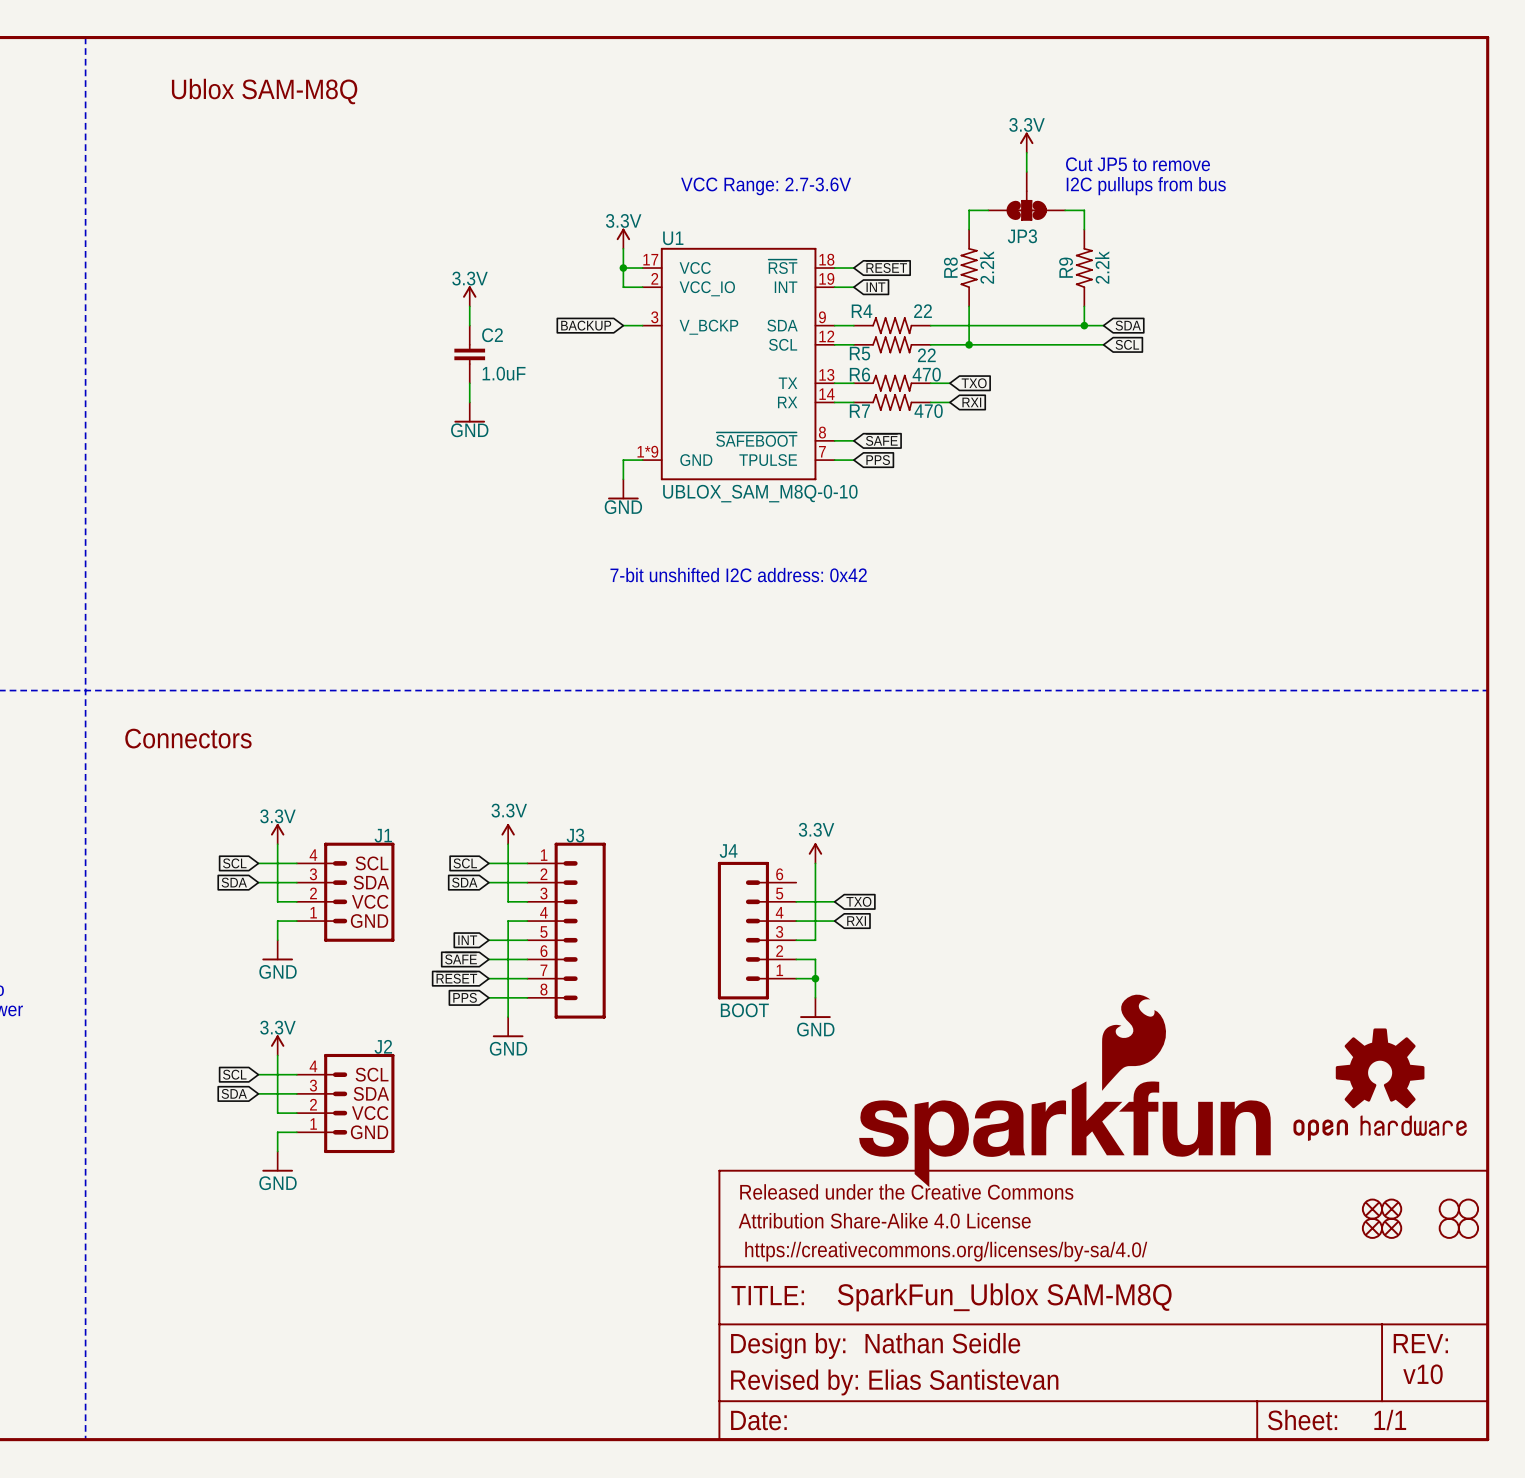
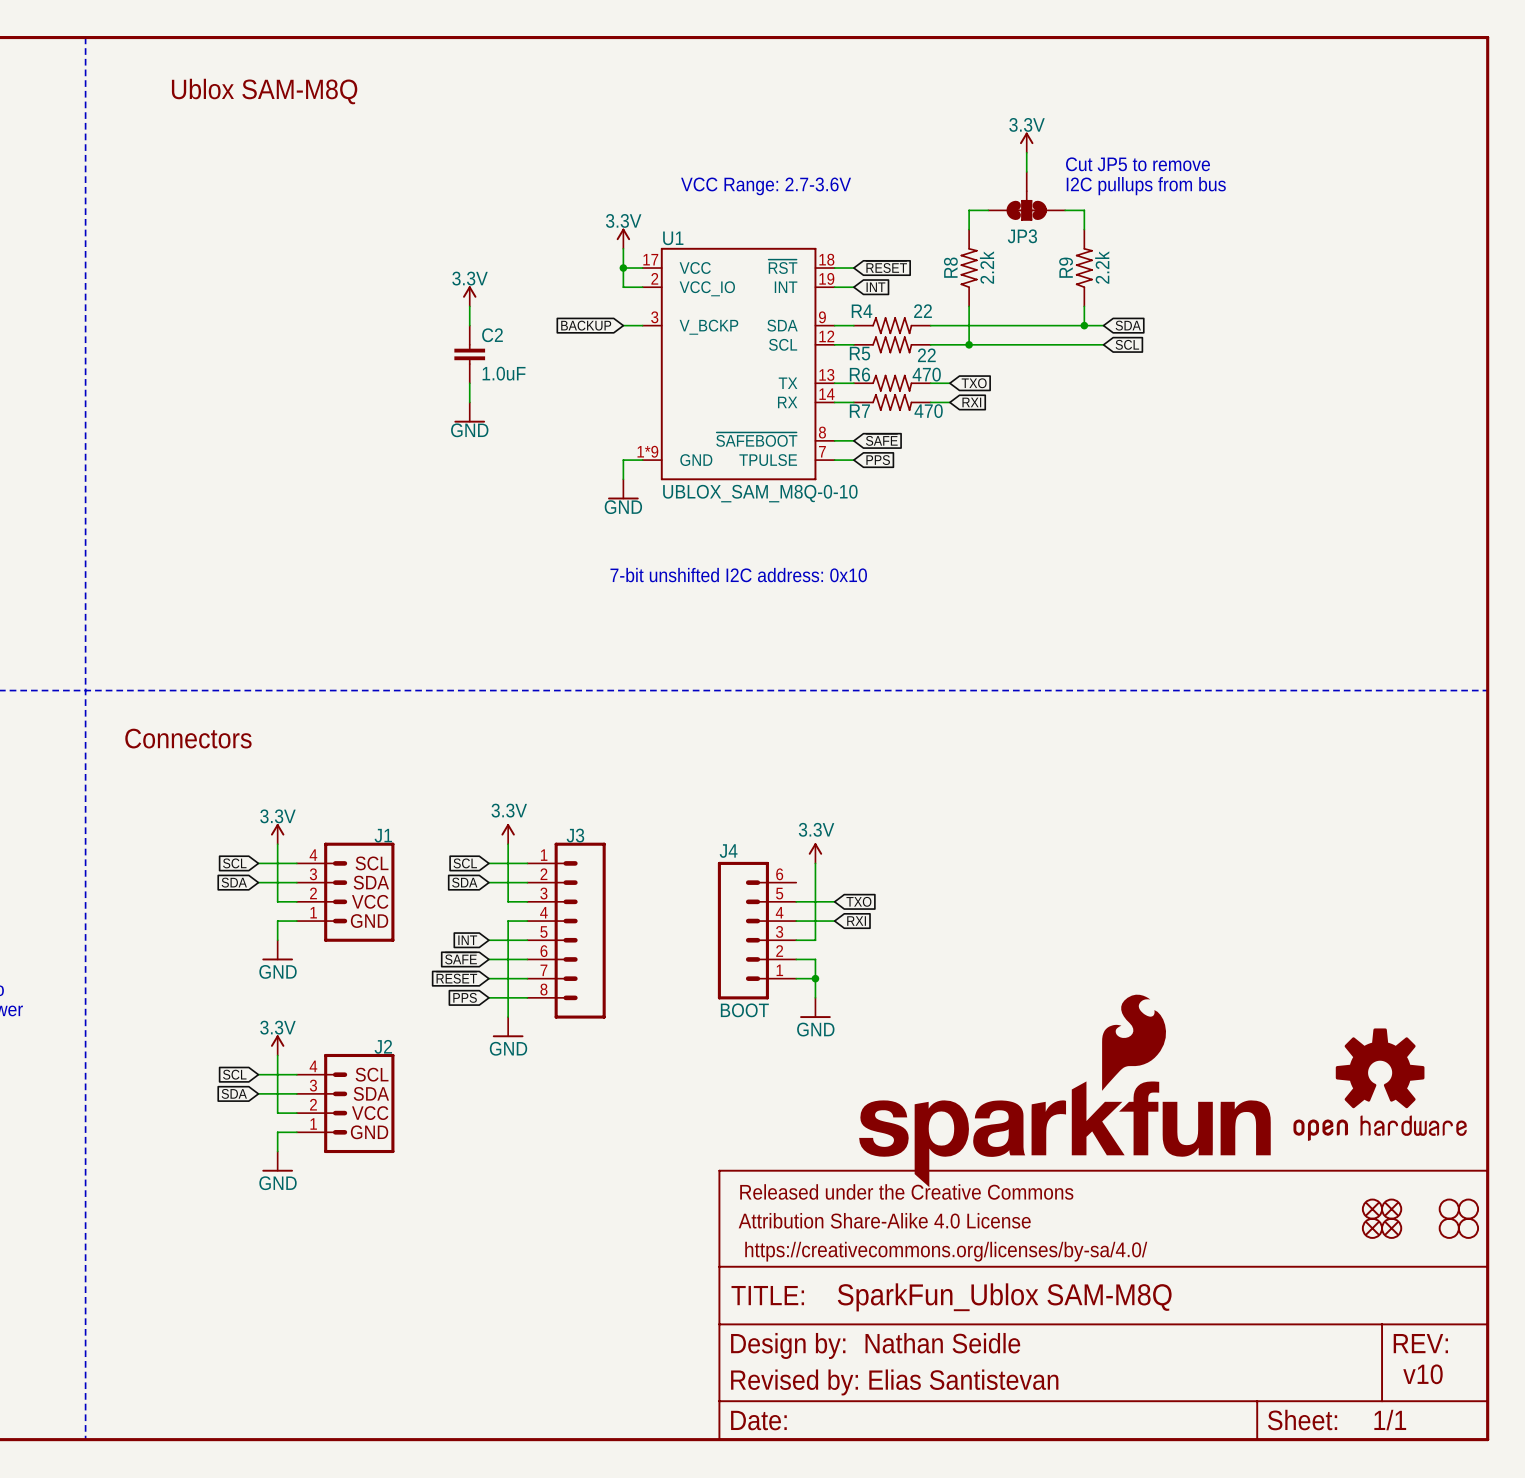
text: 7-bit unshifted I2C address: 0x42 (738, 575) -> 7-bit unshifted I2C address: 0x10 (738, 575)

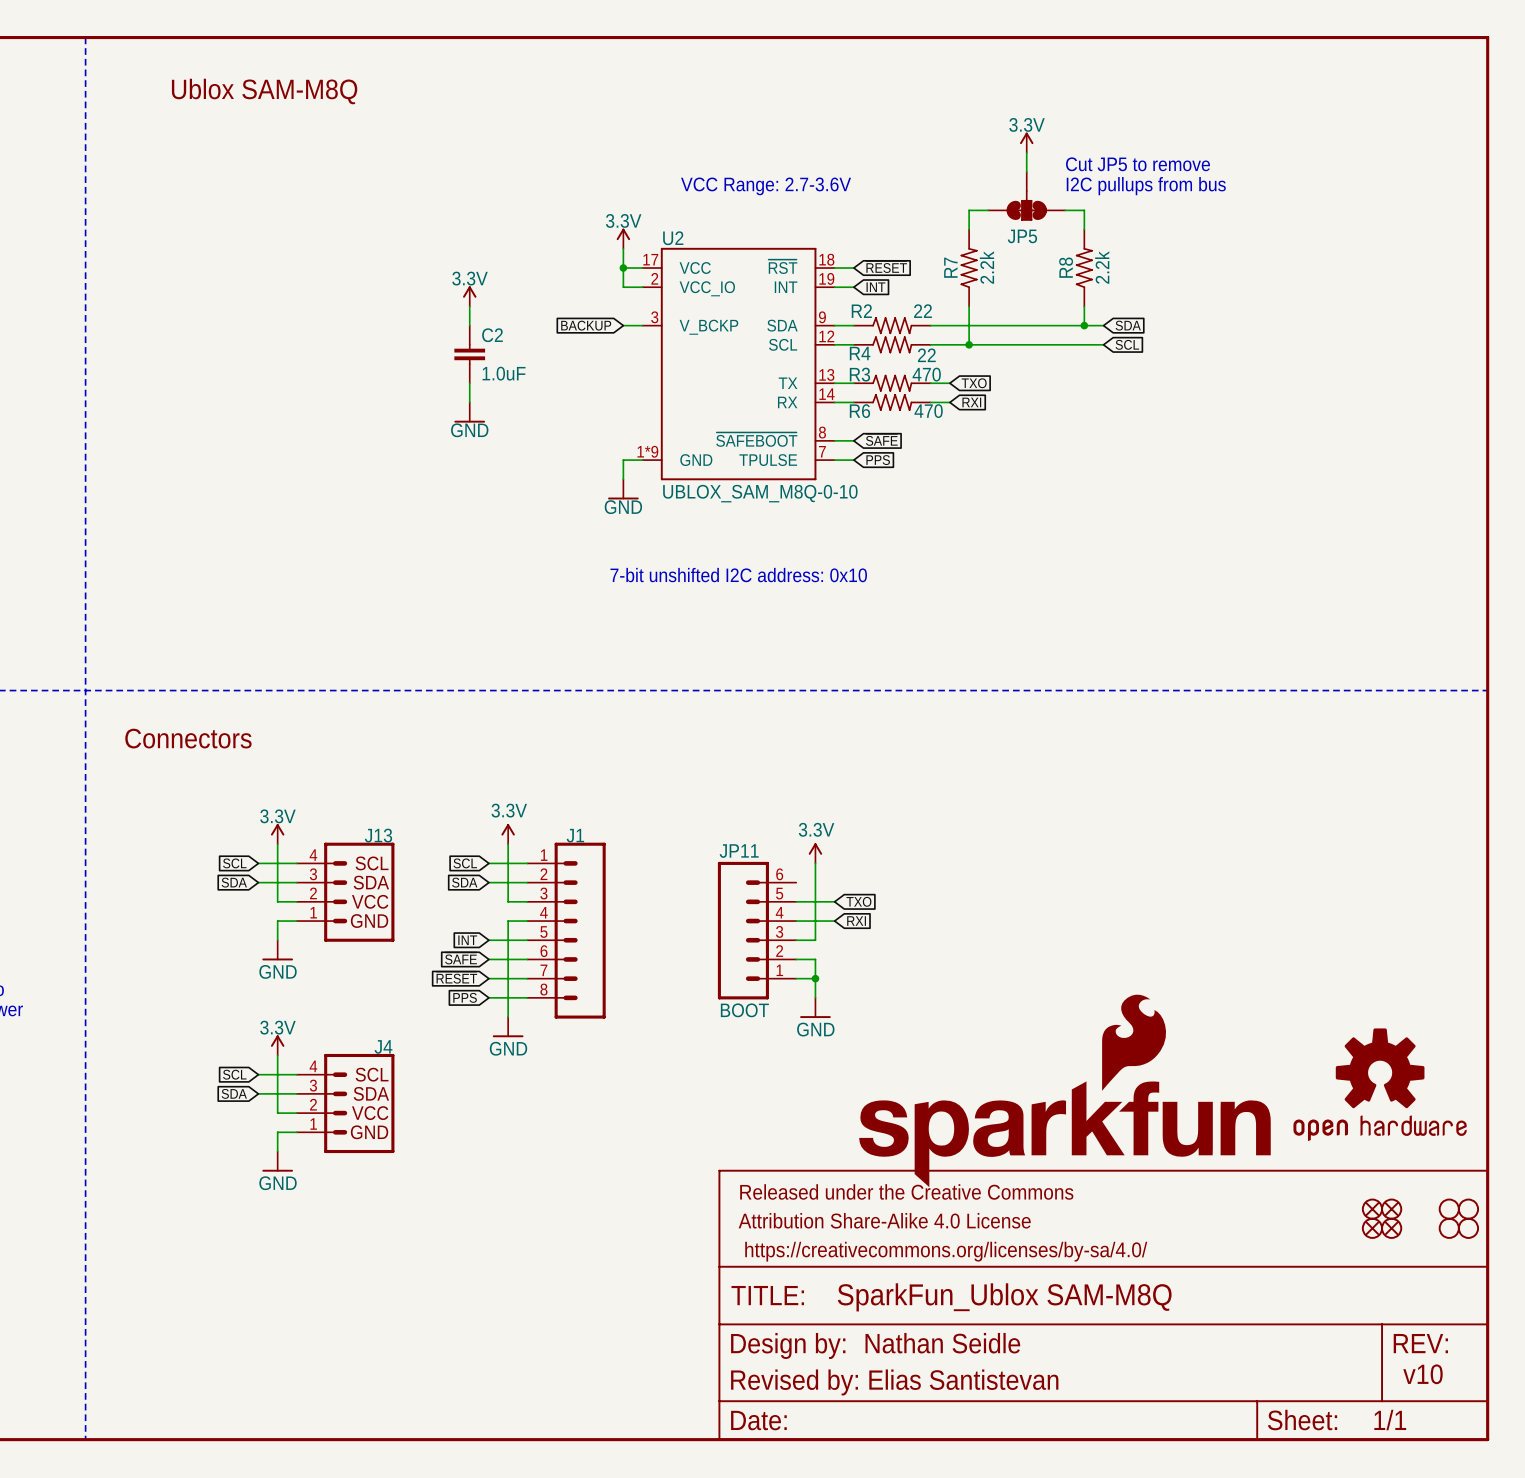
JP3 name: JP3 (1022, 236) -> JP5 (1022, 236)
U1 name: U1 (673, 238) -> U2 (673, 238)
R8 name: R8 (950, 267) -> R7 (950, 267)
R9 name: R9 (1066, 267) -> R8 (1066, 267)
R4 name: R4 (862, 311) -> R2 (861, 311)
R5 name: R5 (859, 353) -> R4 (860, 353)
R6 name: R6 (859, 374) -> R3 (859, 374)
R7 name: R7 (859, 411) -> R6 (859, 411)
J1 name: J1 (383, 835) -> J13 (378, 835)
J3 name: J3 (575, 835) -> J1 (575, 835)
J4 name: J4 (728, 851) -> JP11 (739, 851)
J2 name: J2 (383, 1046) -> J4 (383, 1046)

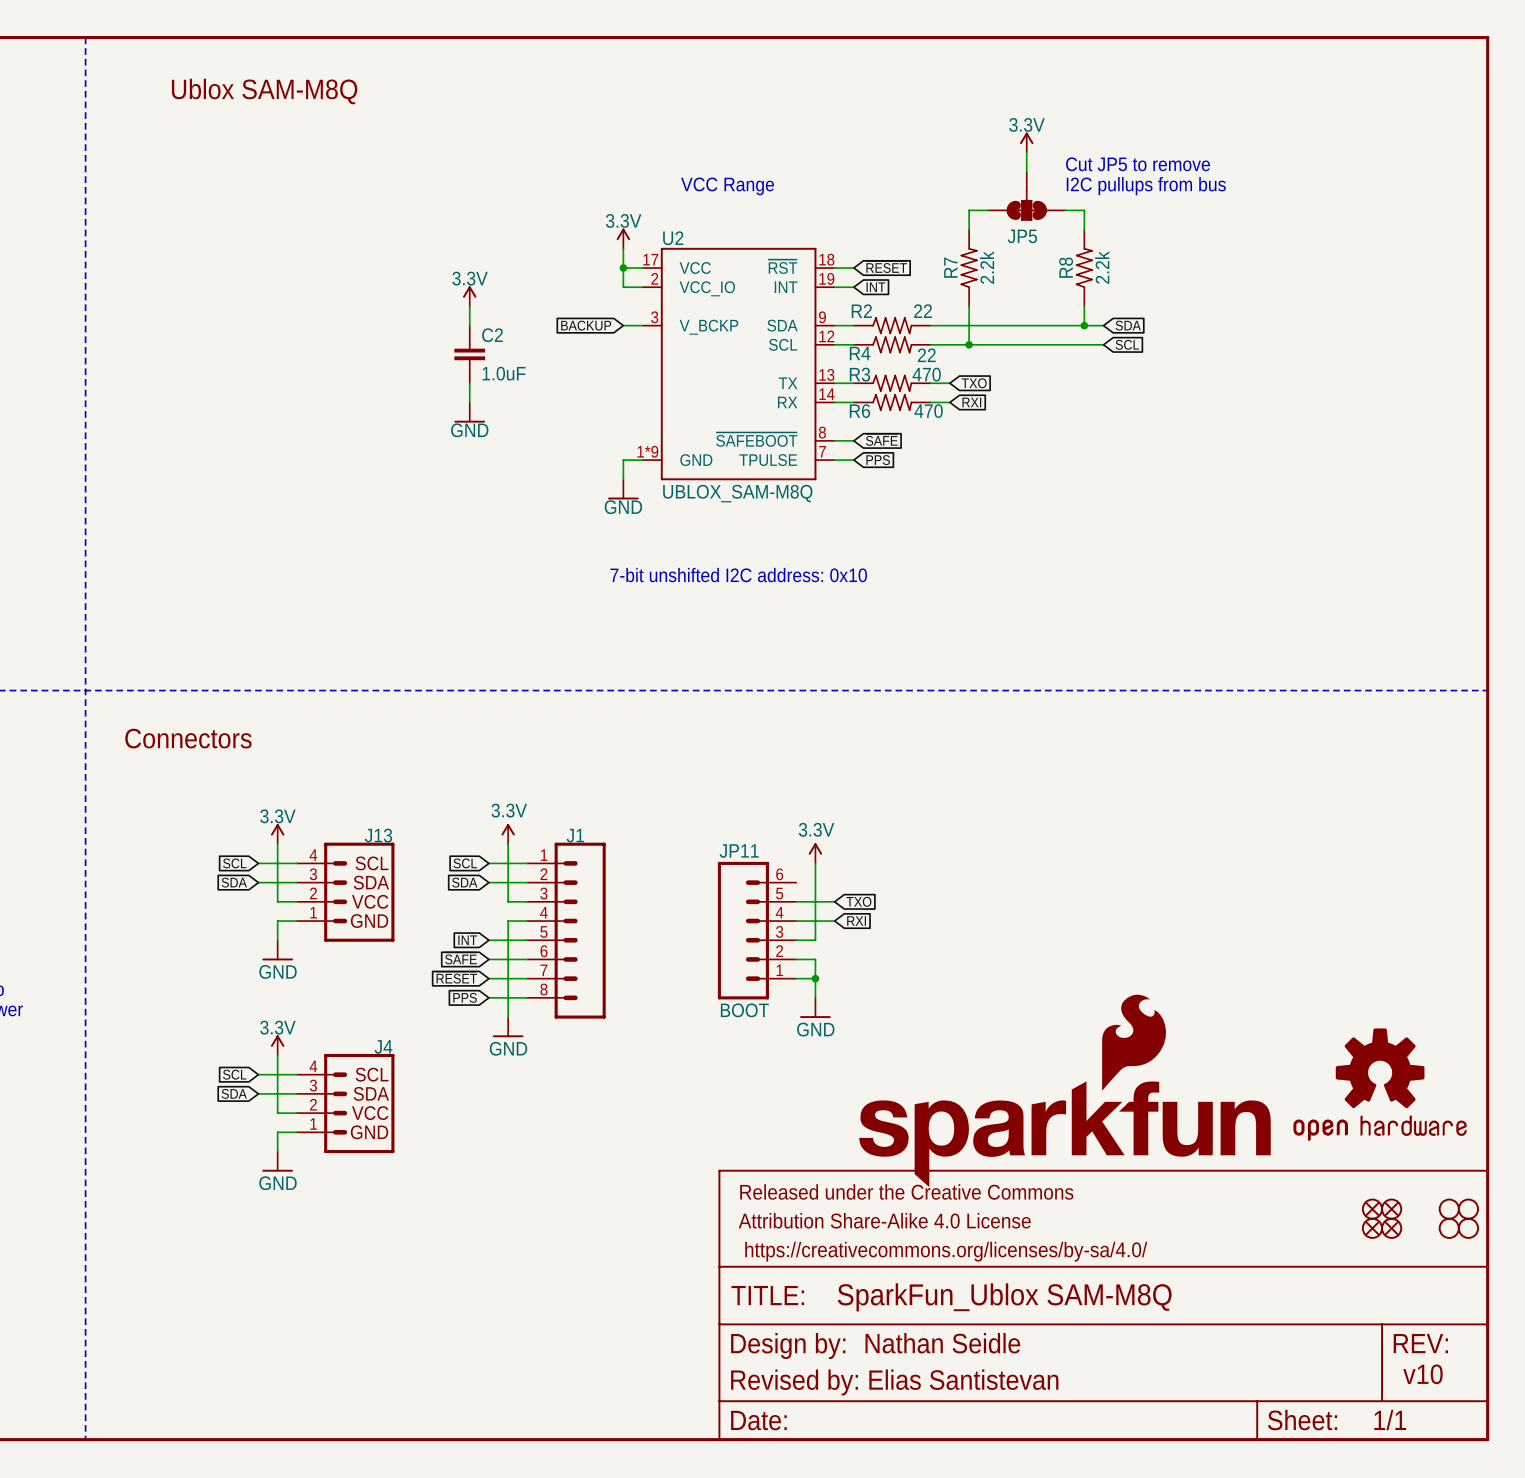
text: VCC Range: 2.7-3.6V (766, 186) -> VCC Range (727, 186)
U2 value: UBLOX_SAM_M8Q-0-10 (760, 493) -> UBLOX_SAM-M8Q (737, 493)

